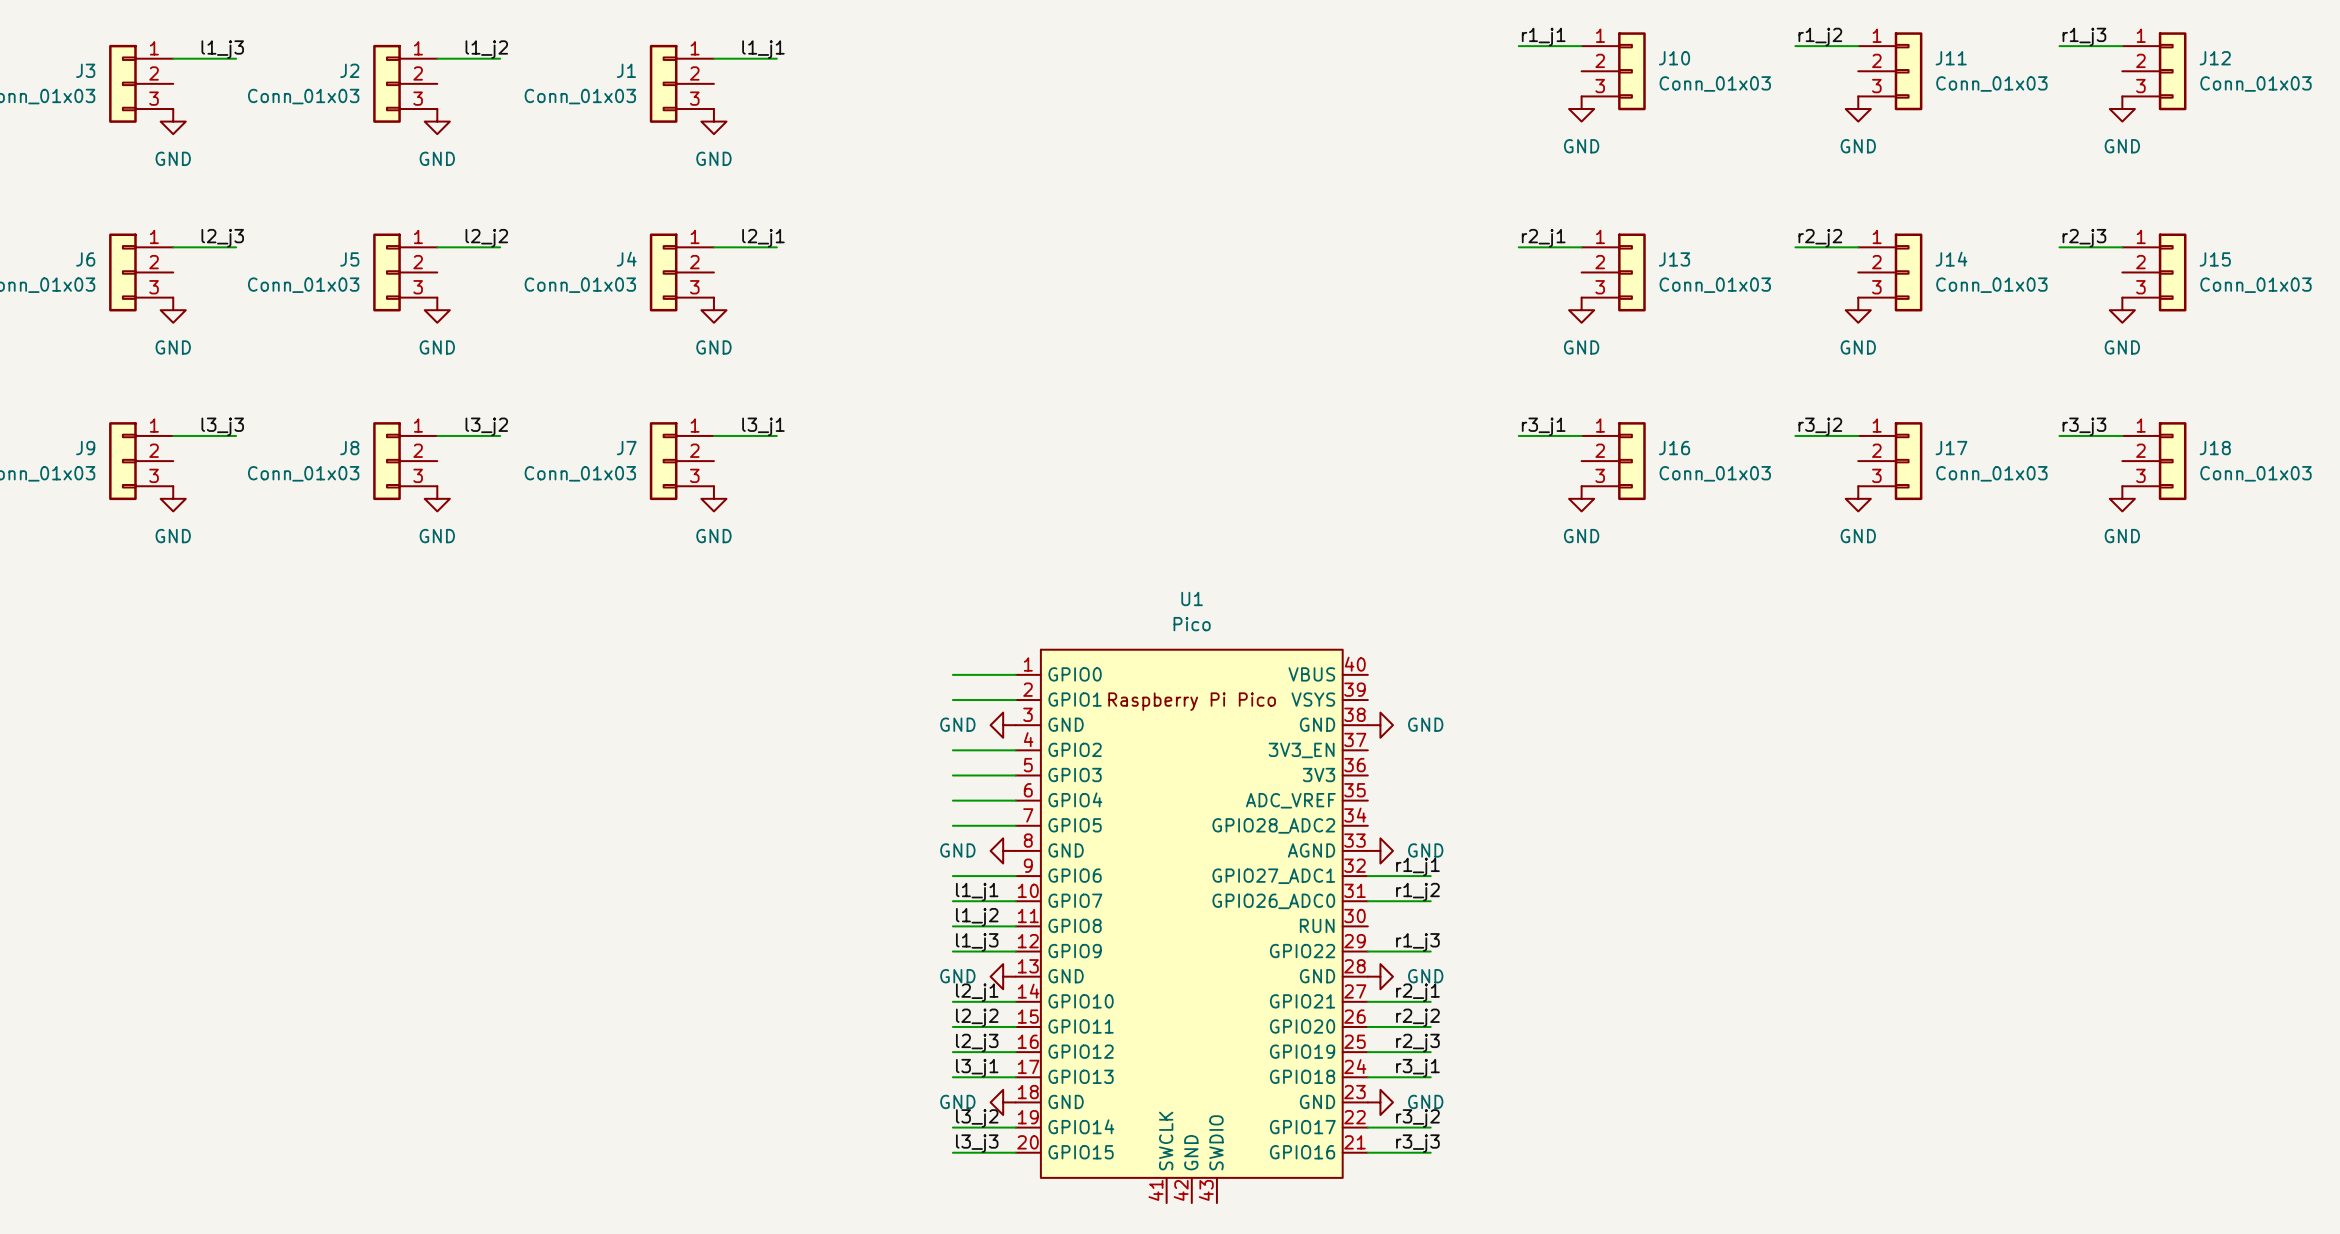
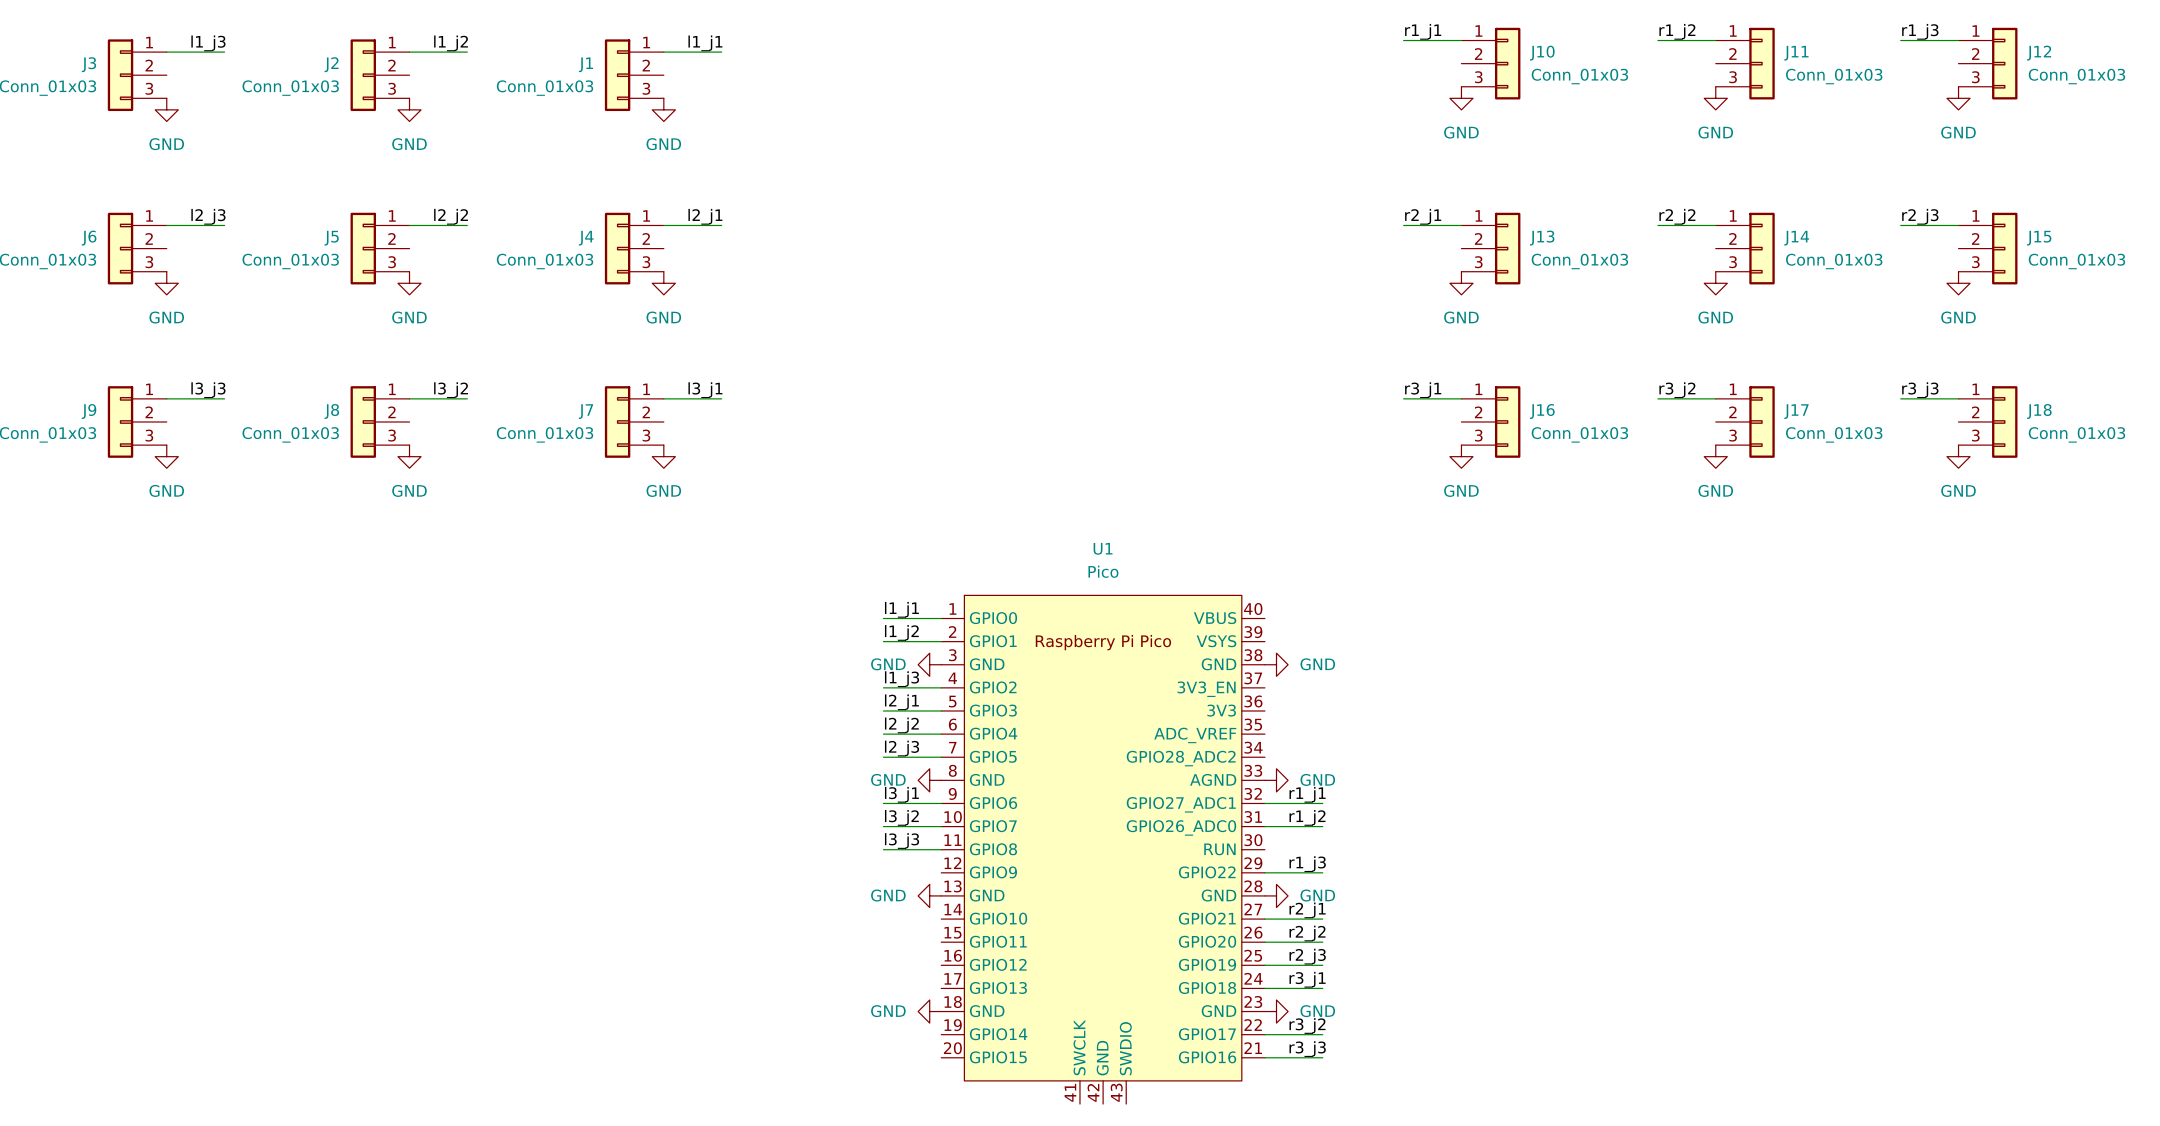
label: none -> l1_j1 (901, 609)
label: none -> l1_j2 (901, 632)
label: l1_j1 (977, 892) -> l3_j2 (901, 817)
label: l1_j2 (977, 917) -> l3_j3 (902, 841)
label position: l1_j3 (977, 942) -> l1_j3 (902, 679)
wire: (952, 951) (1015, 951) -> none
label position: l2_j1 (977, 992) -> l2_j1 (901, 702)
wire: (952, 1001) (1015, 1001) -> none
label position: l2_j2 (977, 1017) -> l2_j2 (901, 725)
wire: (952, 1026) (1015, 1026) -> none
label position: l2_j3 (977, 1043) -> l2_j3 (902, 748)
wire: (952, 1052) (1015, 1052) -> none
label position: l3_j1 (977, 1068) -> l3_j1 (901, 794)
wire: (952, 1077) (1015, 1077) -> none
label: l3_j2 (977, 1118) -> none
wire: (952, 1127) (1015, 1127) -> none
label: l3_j3 (977, 1143) -> none
wire: (952, 1152) (1015, 1152) -> none

